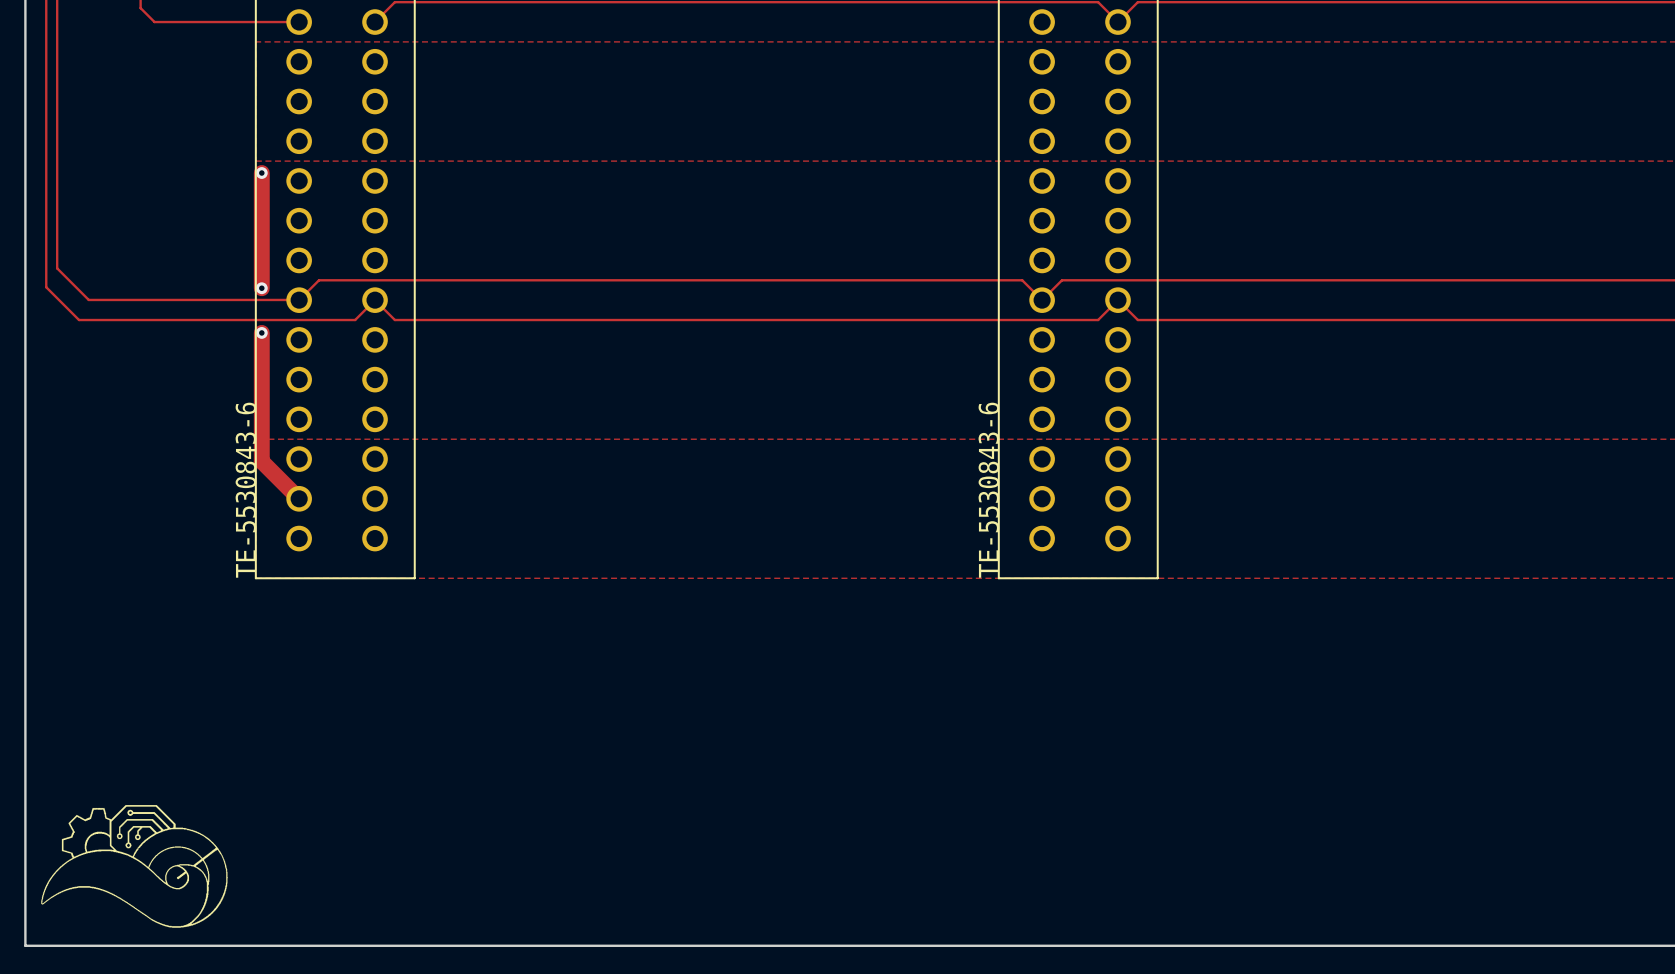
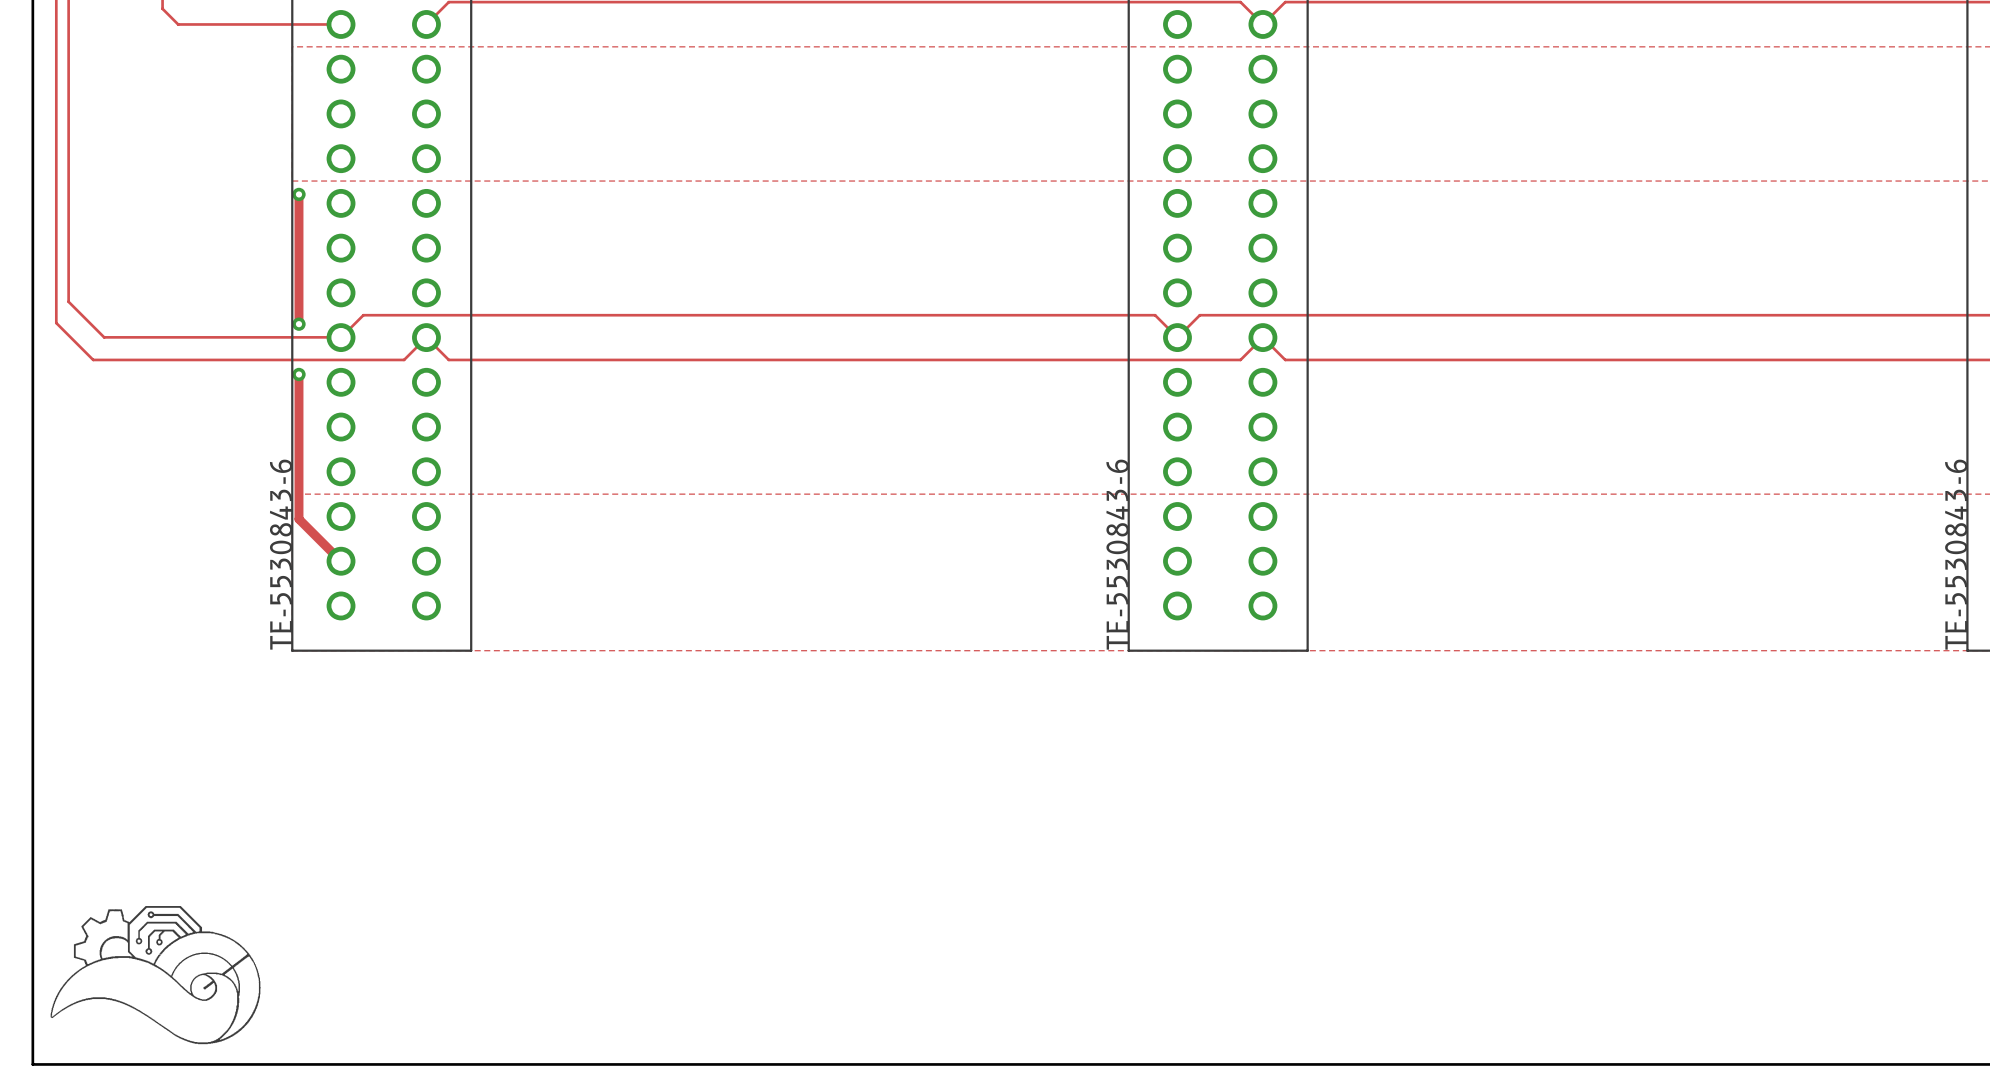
track width: thick (261, 173) (261, 288) -> thin (298, 194) (298, 324)
track width: thick (261, 332) (261, 461) (299, 498) -> thin (298, 374) (298, 519) (341, 561)

